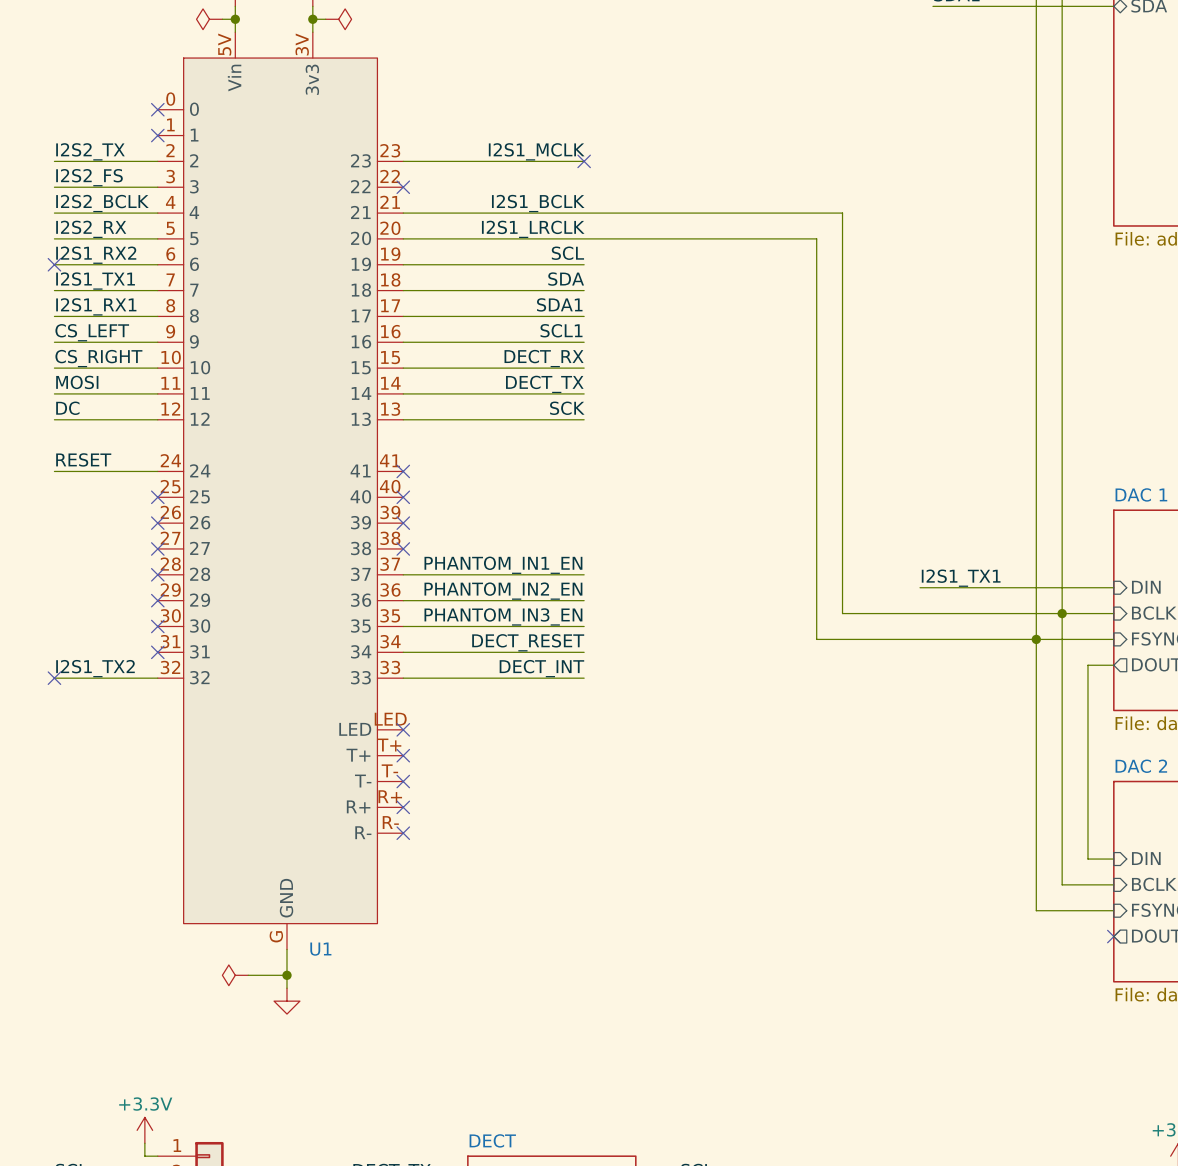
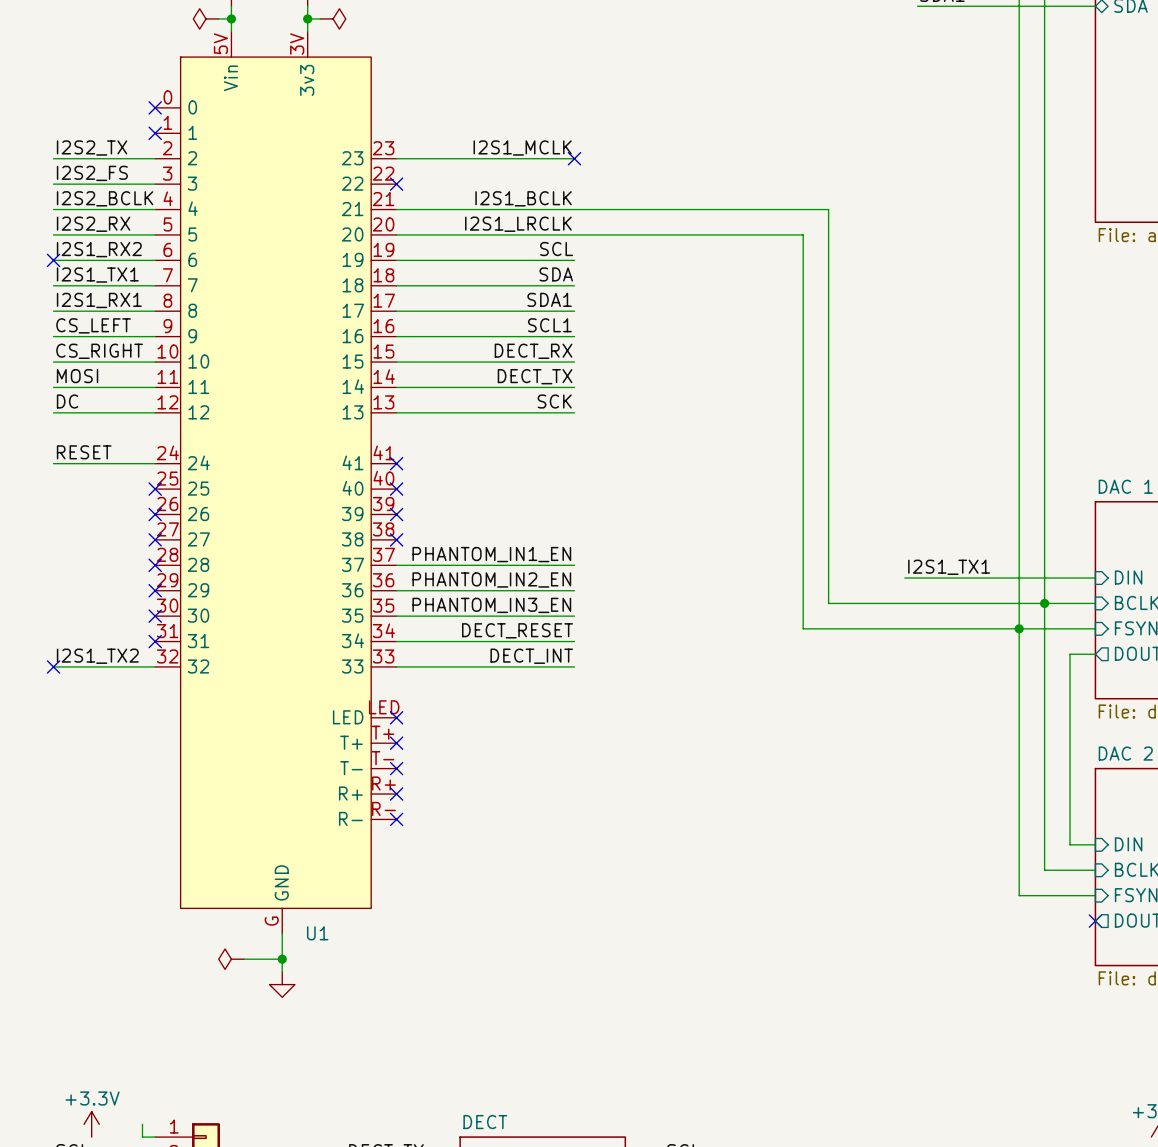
power symbol position: +3.3V (144, 1130) -> +3.3V (91, 1124)

